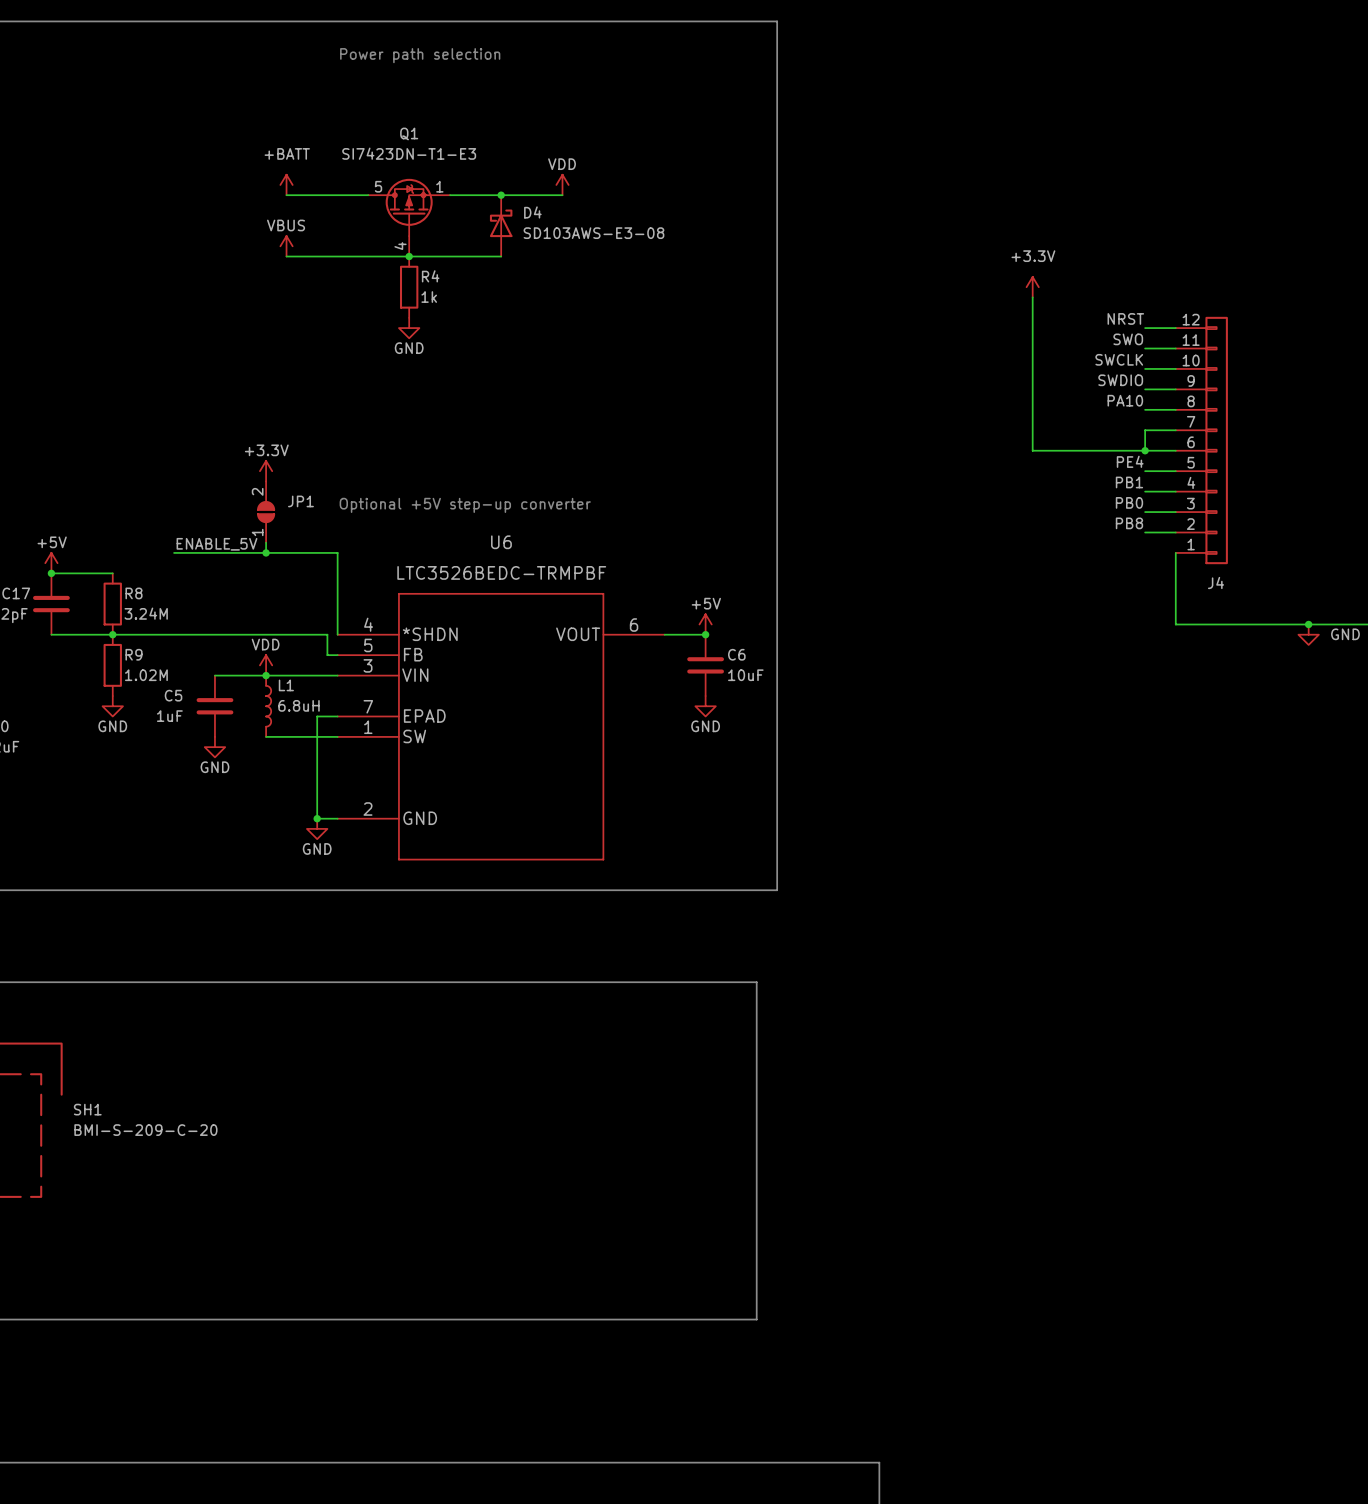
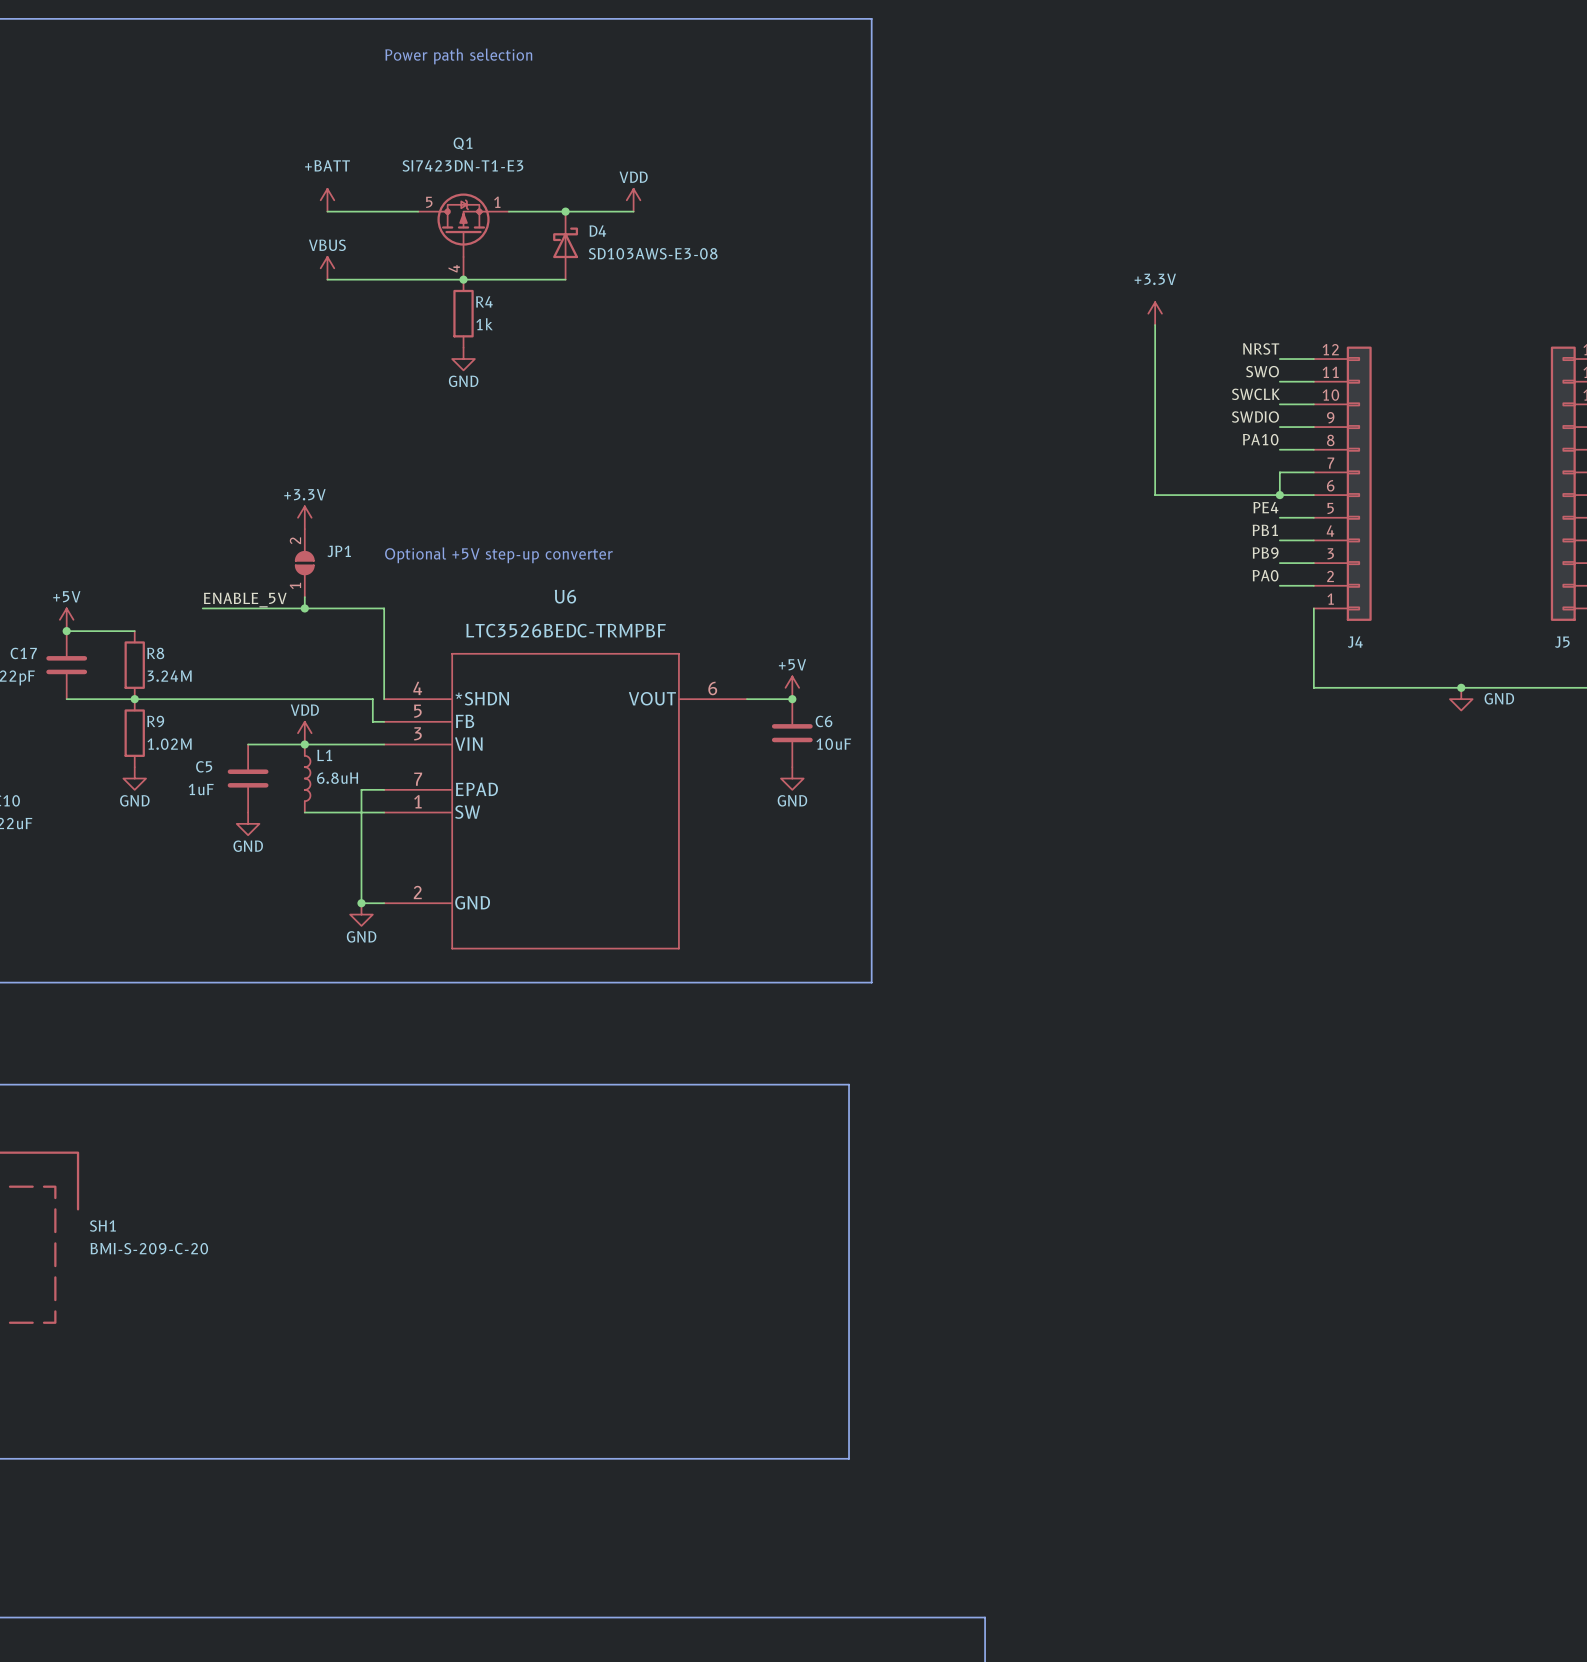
label: PB0 (1129, 502) -> PB9 (1265, 553)
label: PB8 (1129, 523) -> PA0 (1265, 575)

